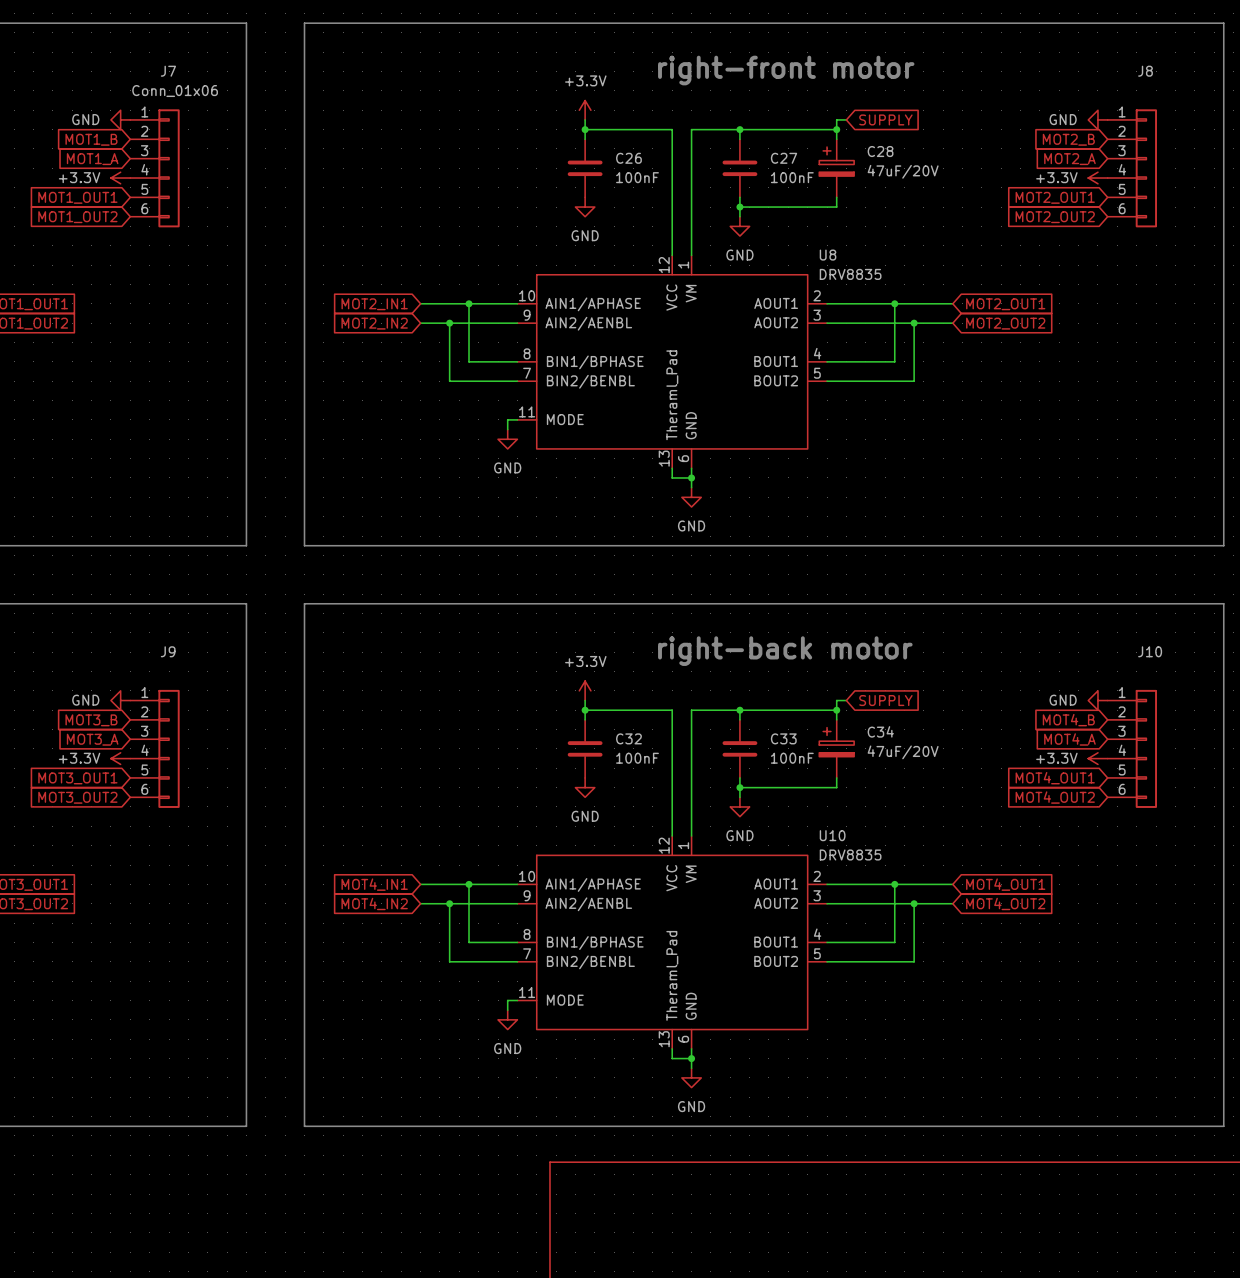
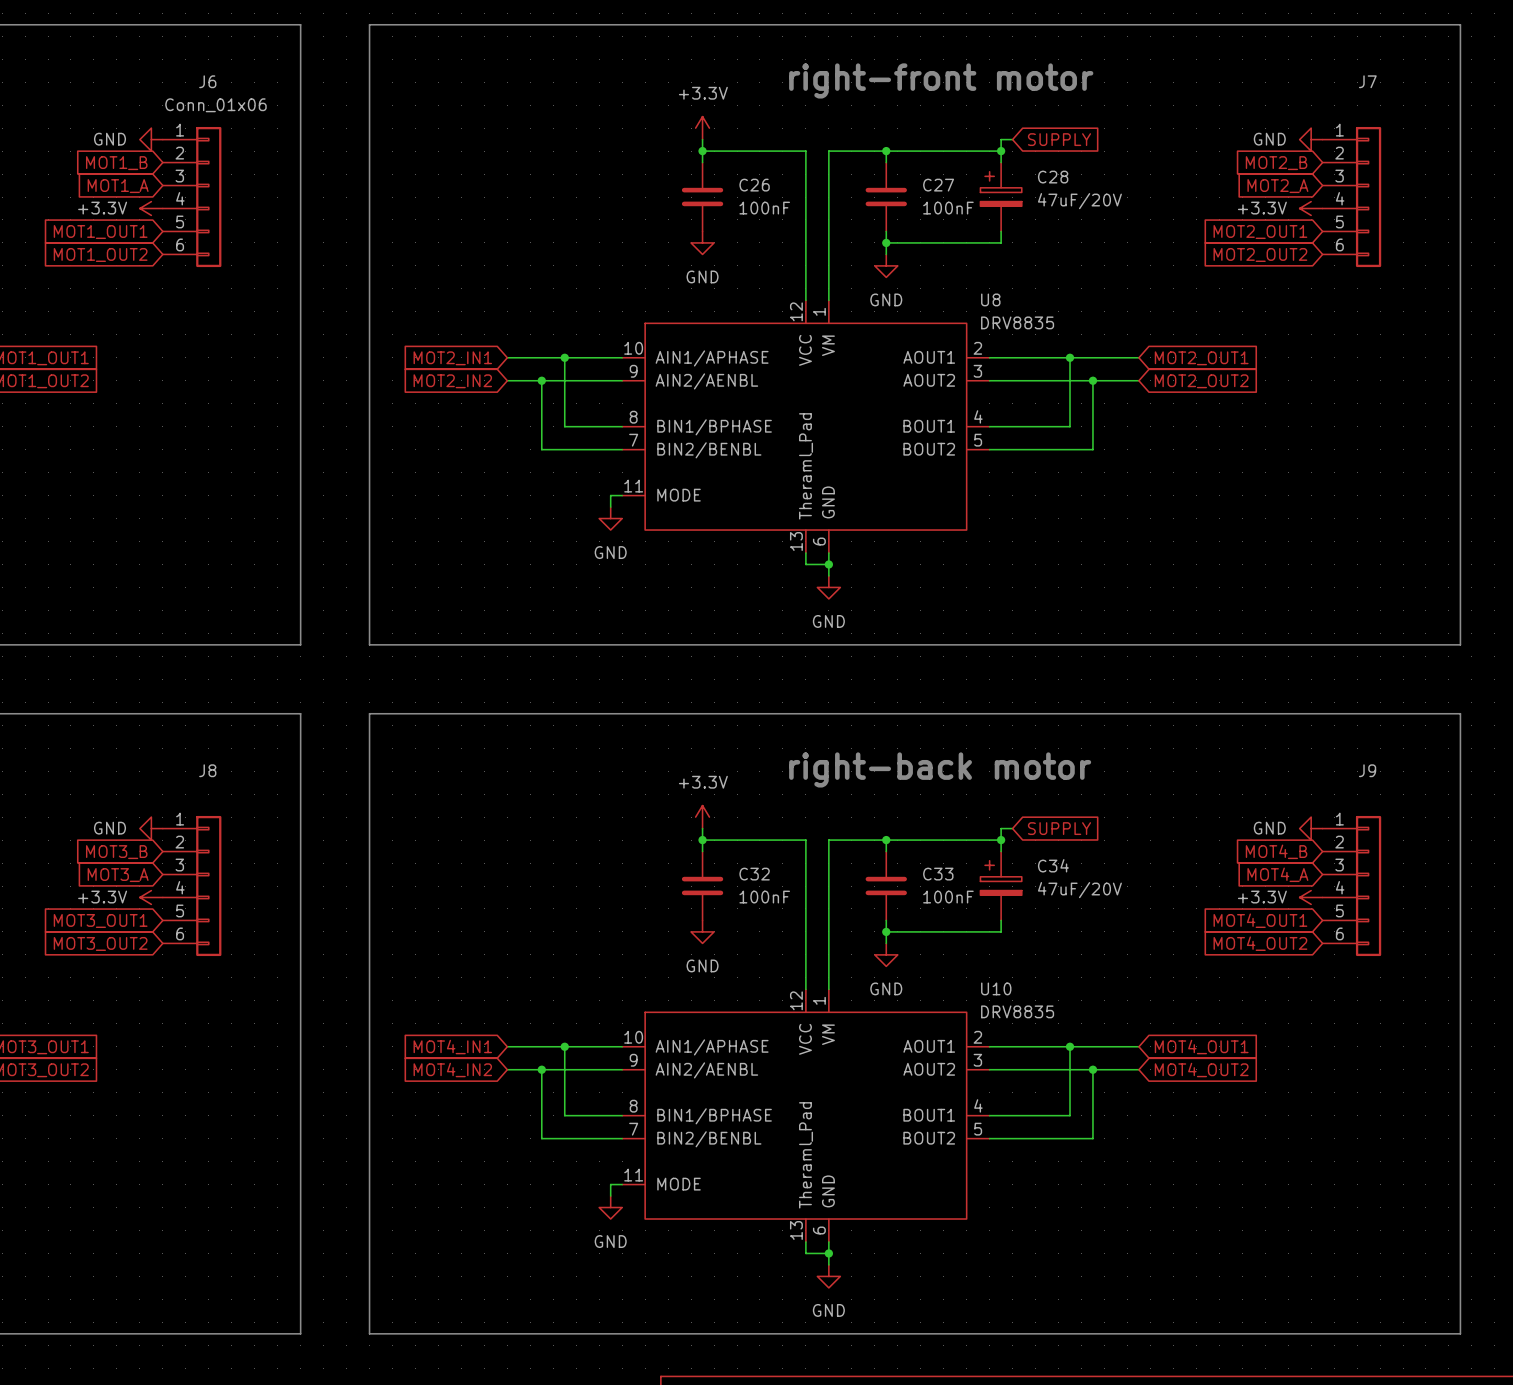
J7 name: J7 (168, 71) -> J6 (207, 81)
J8 name: J8 (1145, 71) -> J7 (1367, 81)
J9 name: J9 (168, 651) -> J8 (207, 770)
J10 name: J10 (1150, 651) -> J9 (1367, 770)

